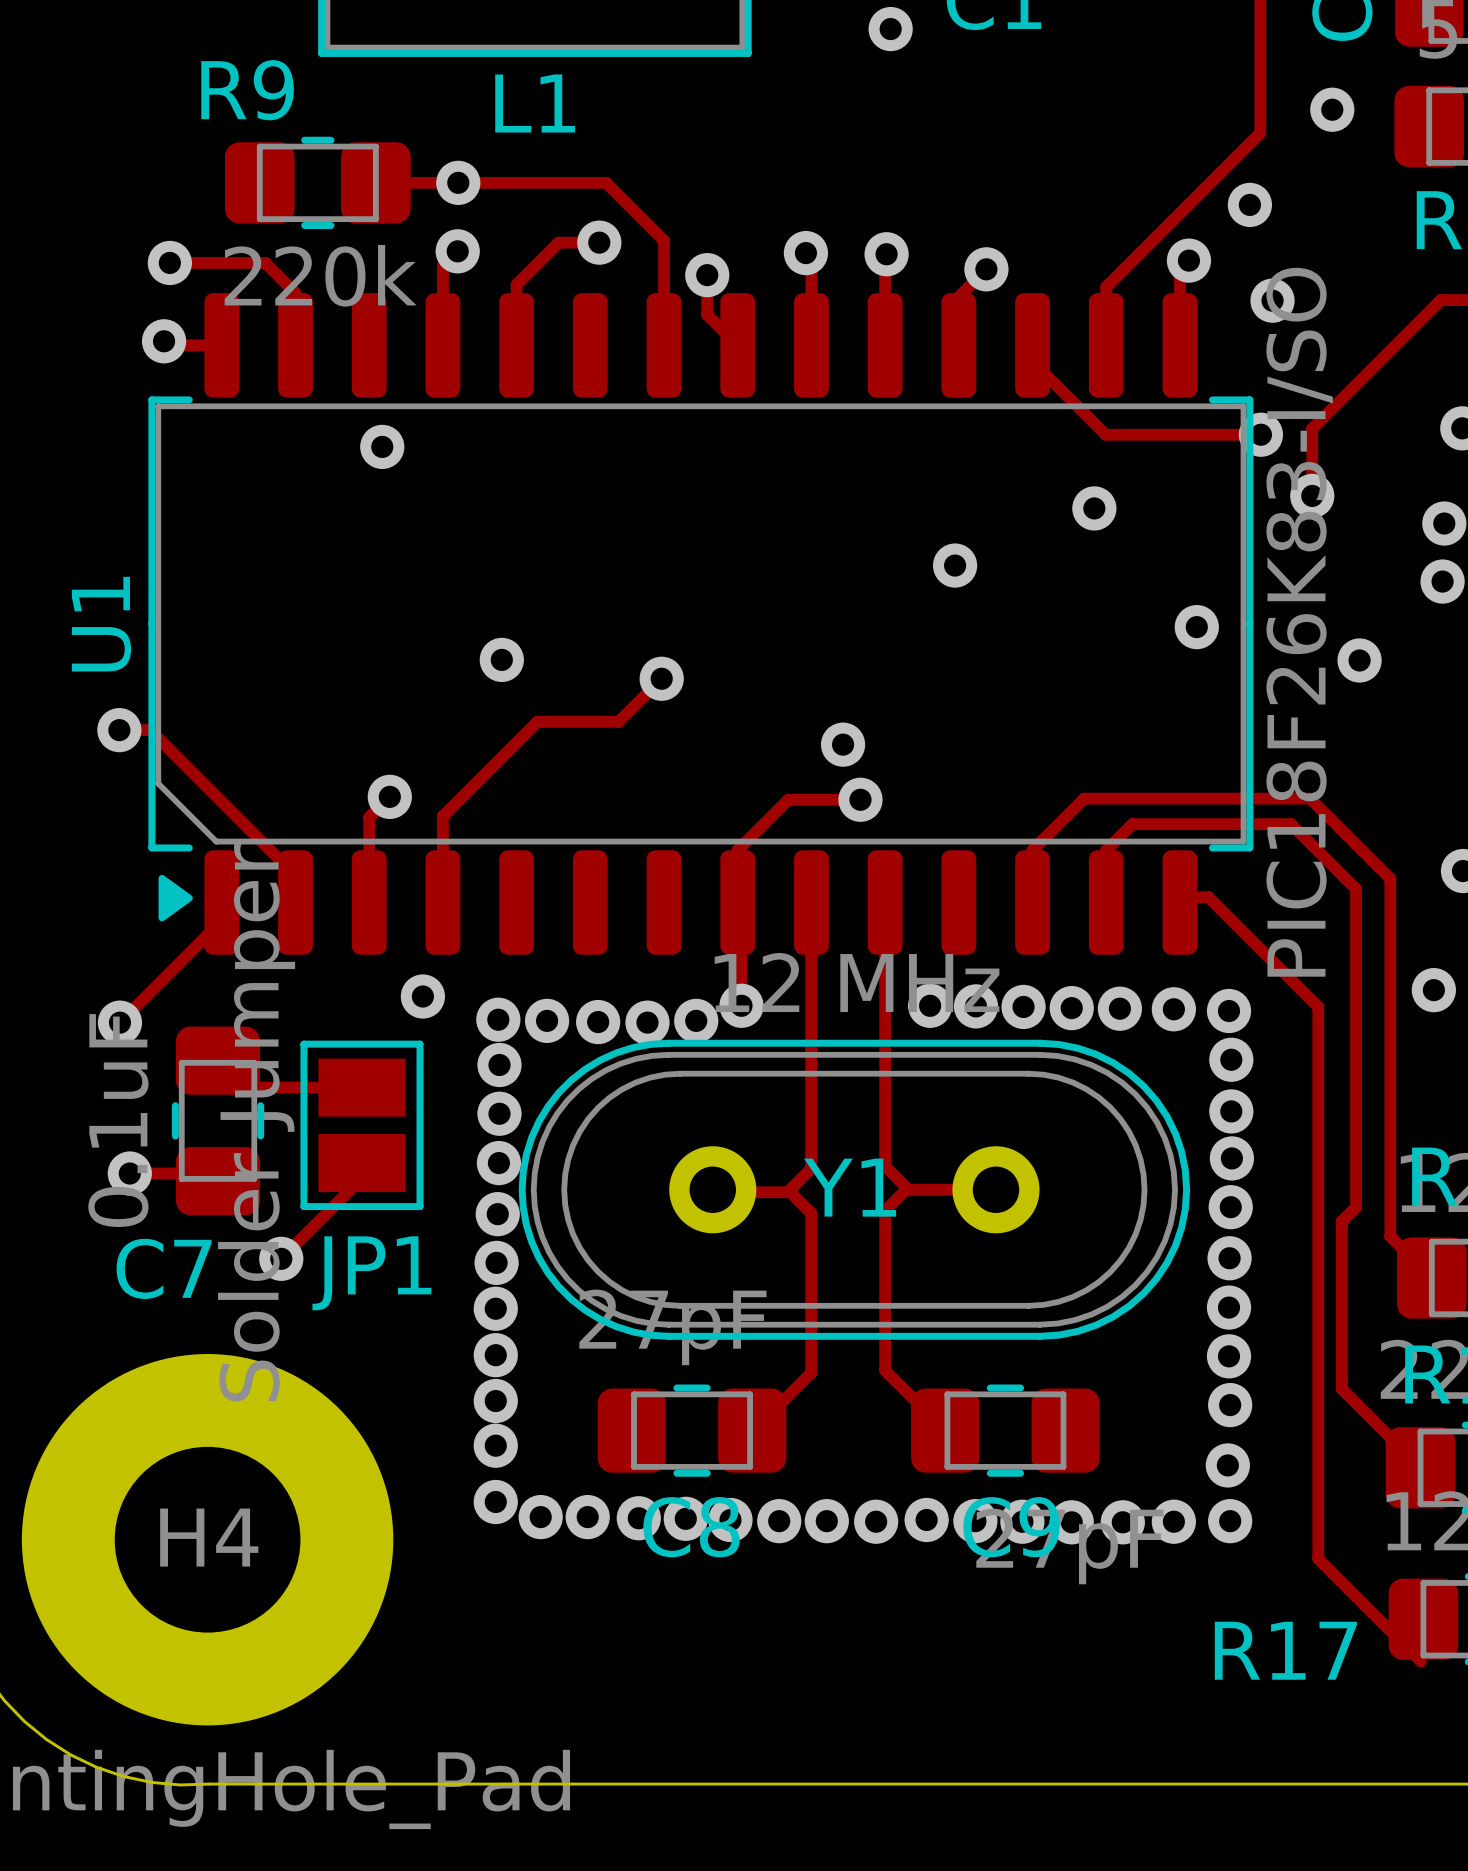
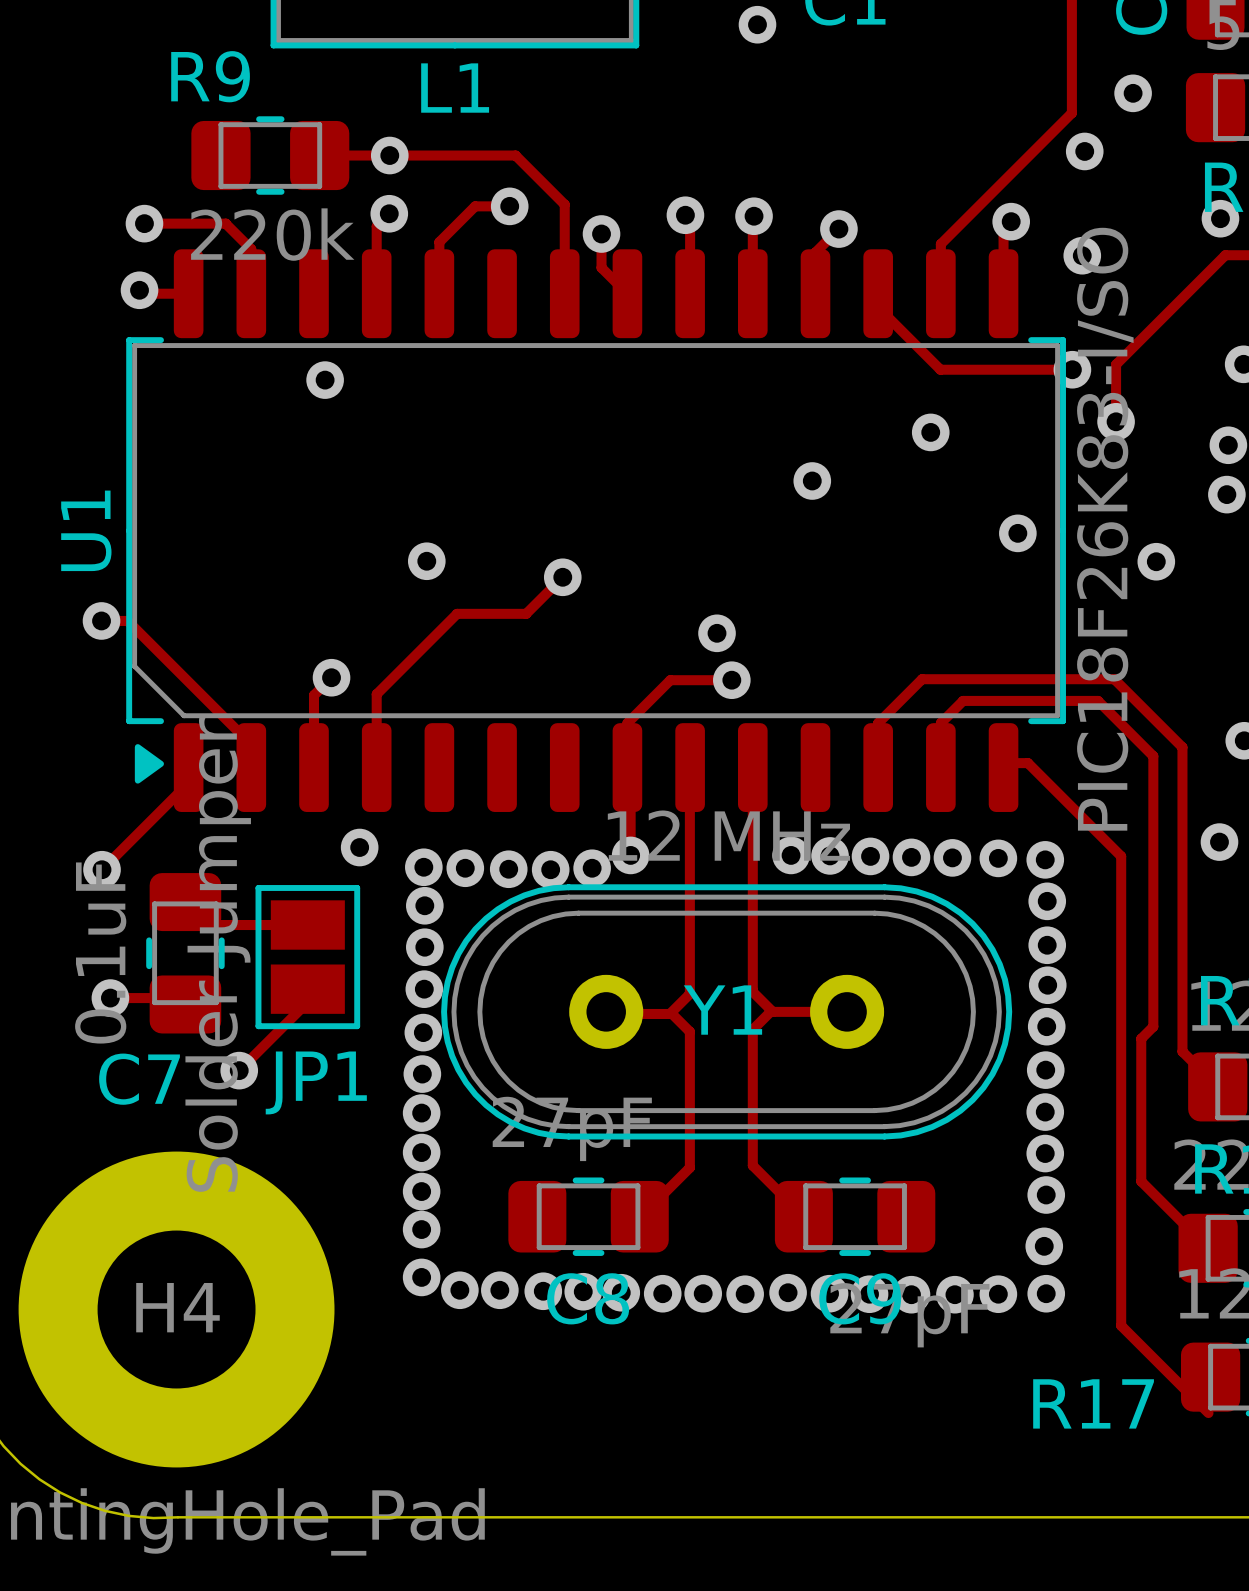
via position: (1249, 204) -> (1084, 151)
via: none -> (1220, 218)

